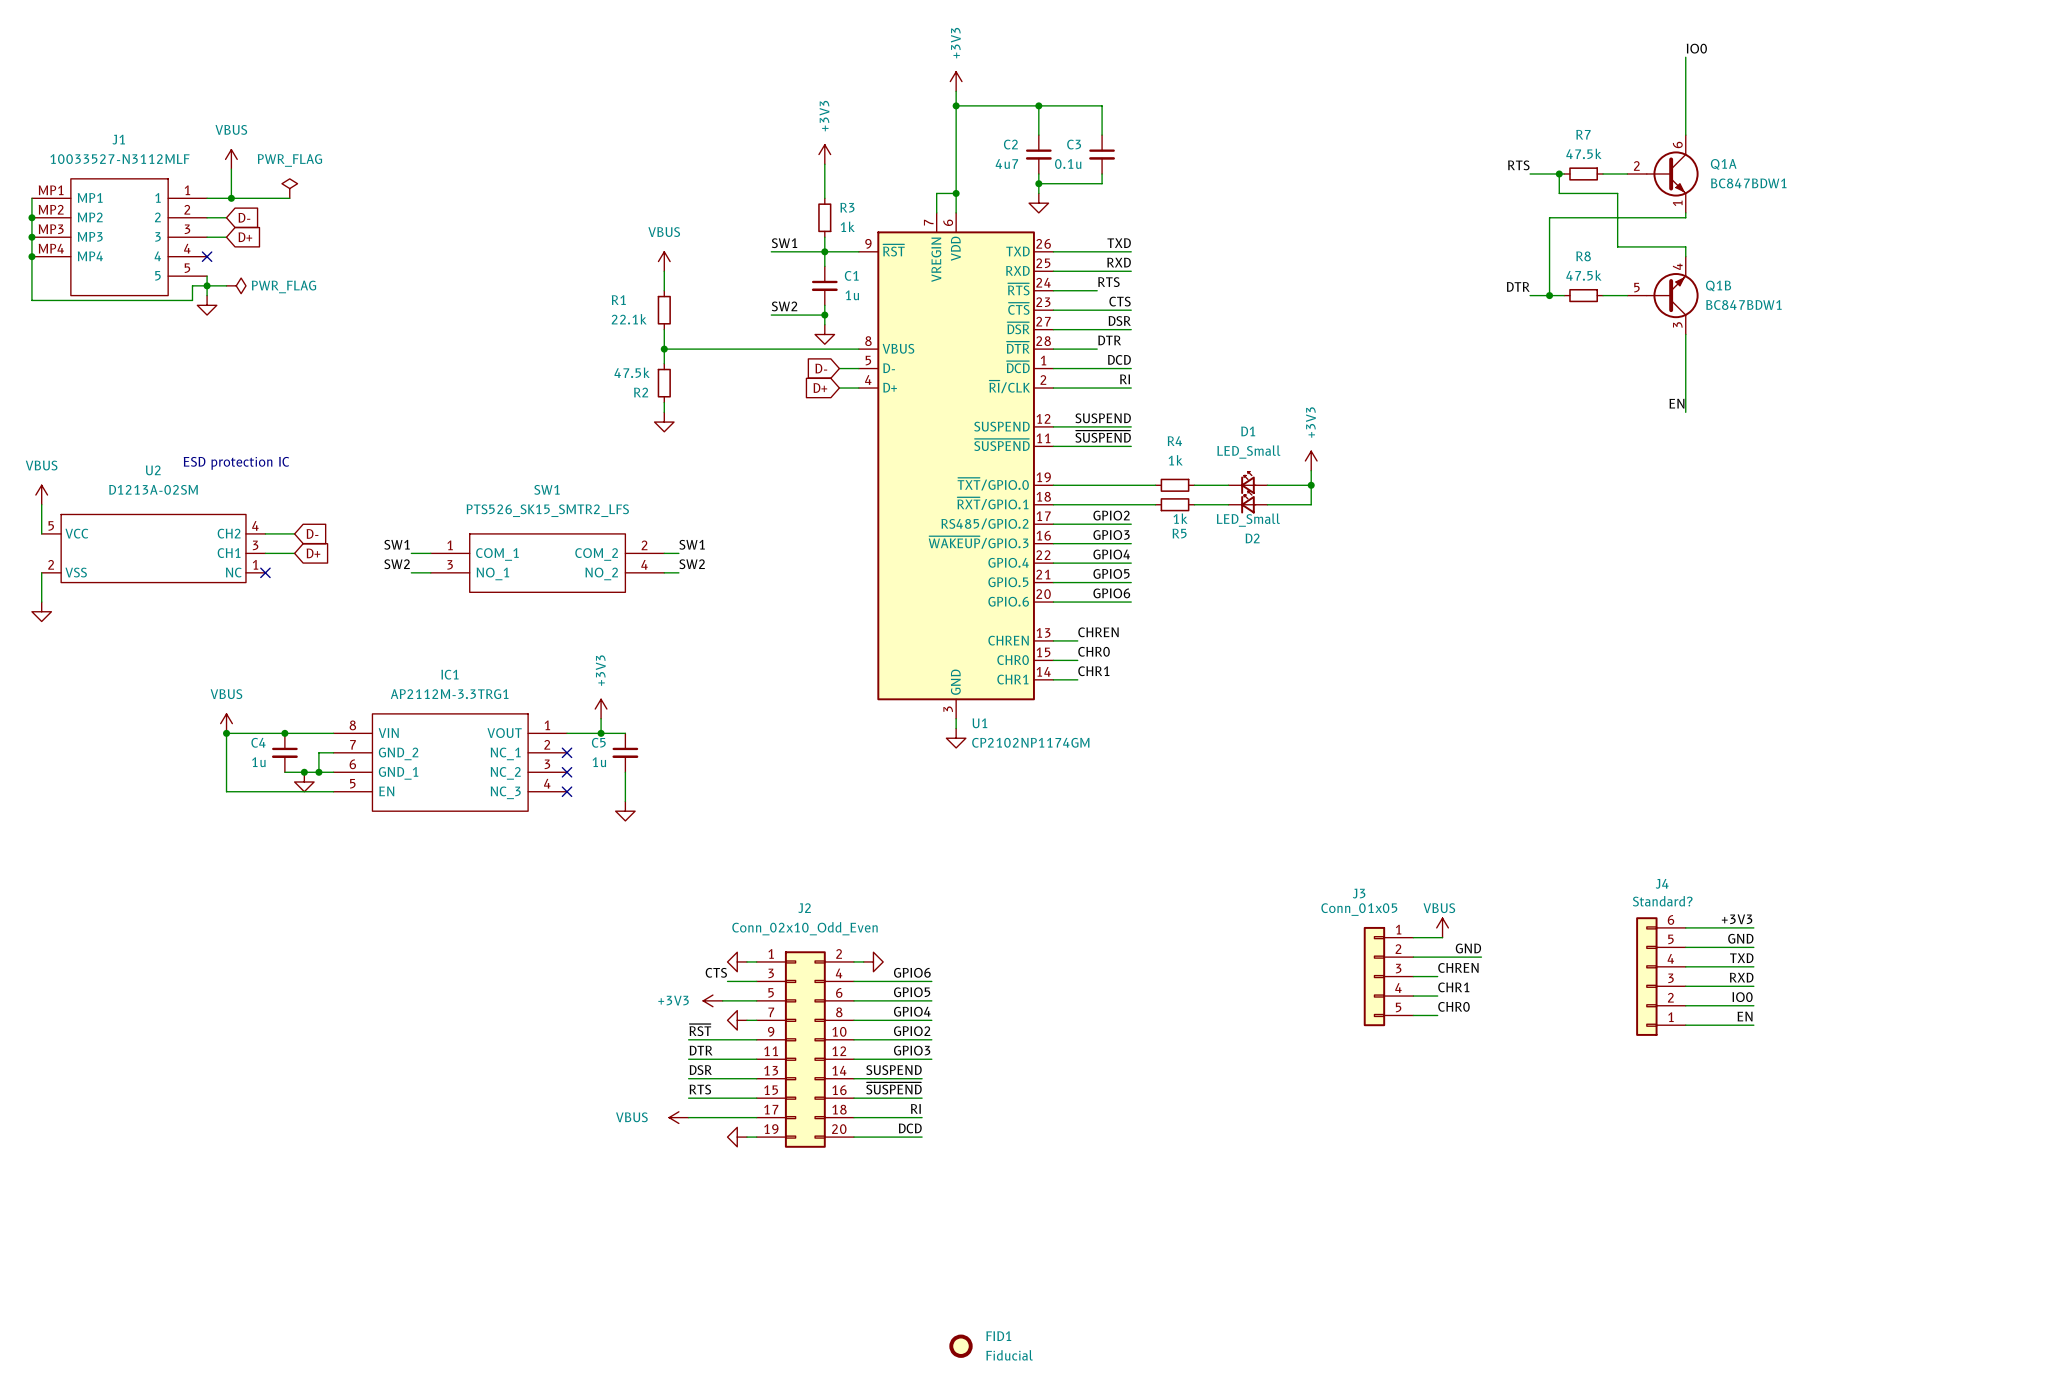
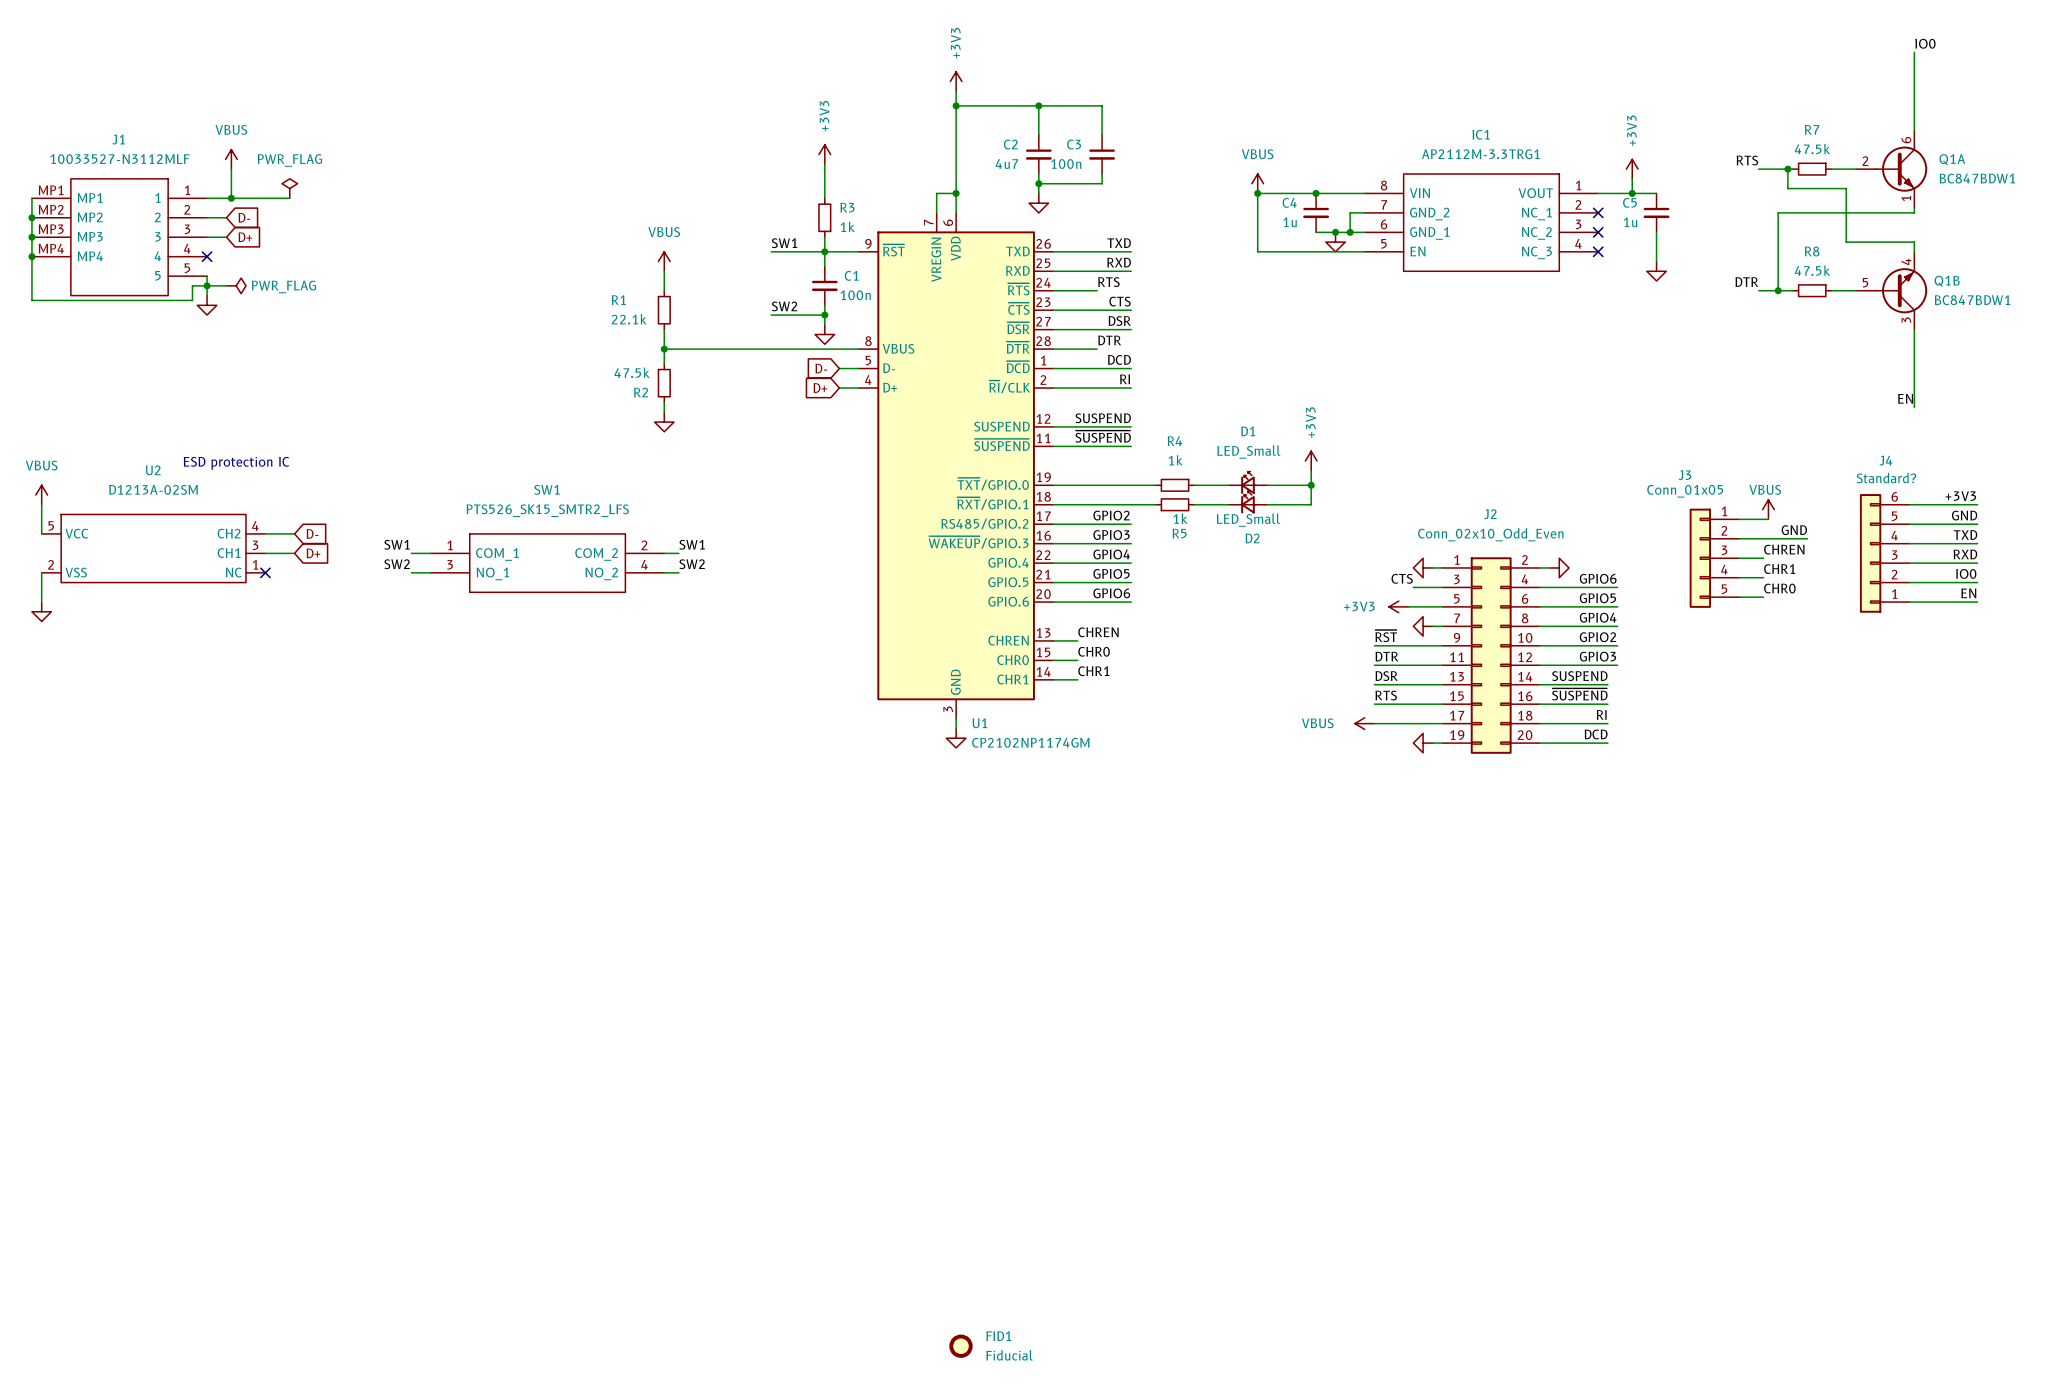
label: none -> IO0 (1925, 43)
label: IO0 (1696, 48) -> none
wire: none -> (1914, 52) (1914, 130)
wire: (1685, 57) (1685, 135) -> none
label: none -> RTS (1747, 160)
C3 value: 0.1u (1068, 164) -> 100n (1066, 164)
label: RTS (1518, 165) -> none
power symbol: none -> +3V3 (1632, 169)
wire: none -> (1758, 169) (1792, 169)
wire: none -> (1787, 169) (1787, 188) (1846, 188) (1846, 242) (1914, 242) (1914, 251)
junction: none -> (1787, 169)
wire: none -> (1831, 169) (1855, 169)
junction: (1559, 173) -> none
R7 position: (1583, 173) -> (1812, 169)
wire: (1603, 173) (1627, 173) -> none
Q1A position: (1662, 173) -> (1891, 169)
wire: none -> (1632, 178) (1632, 193)
power symbol: none -> VBUS (1257, 183)
junction: none -> (1257, 193)
junction: none -> (1316, 193)
wire: none -> (1364, 193) (1257, 193) (1257, 251) (1364, 251)
wire: (1617, 193) (1617, 246) (1685, 246) (1685, 256) -> (1617, 193) (1656, 193)
junction: none -> (1632, 193)
wire: none -> (1914, 208) (1914, 212) (1778, 212) (1778, 290)
wire: none -> (1364, 212) (1350, 212) (1350, 232)
no-connect mark: none -> (1598, 212)
wire: (1685, 212) (1685, 217) (1549, 217) (1549, 295) -> none
wire: none -> (1316, 232) (1364, 232)
junction: none -> (1335, 232)
junction: none -> (1350, 232)
no-connect mark: none -> (1598, 232)
wire: none -> (1656, 232) (1656, 261)
power symbol: none -> (1335, 242)
no-connect mark: none -> (1598, 251)
power symbol: none -> (1656, 271)
label: none -> DTR (1746, 282)
label: DTR (1518, 286) -> none
wire: none -> (1758, 290) (1792, 290)
junction: none -> (1778, 290)
wire: none -> (1831, 290) (1855, 290)
C1 value: 1u (852, 295) -> 100n (855, 295)
wire: (1530, 295) (1564, 295) -> none
junction: (1549, 295) -> none
R8 position: (1583, 295) -> (1812, 290)
wire: (1603, 295) (1627, 295) -> none
Q1B position: (1662, 295) -> (1891, 290)
wire: none -> (1914, 329) (1914, 407)
wire: (1685, 334) (1685, 412) -> none
label: none -> EN (1905, 398)
label: EN (1676, 403) -> none
label: none -> +3V3 (1960, 496)
wire: none -> (1909, 504) (1977, 504)
power symbol: none -> VBUS (1768, 509)
label: none -> GND (1964, 515)
wire: none -> (1739, 519) (1768, 519)
wire: none -> (1909, 524) (1977, 524)
label: none -> GND (1794, 530)
label: none -> TXD (1965, 534)
wire: none -> (1739, 538) (1807, 538)
wire: none -> (1909, 543) (1977, 543)
label: none -> CHREN (1784, 549)
label: none -> RXD (1965, 554)
wire: none -> (1739, 558) (1763, 558)
wire: none -> (1909, 563) (1977, 563)
power symbol: none -> (1423, 567)
wire: none -> (1432, 567) (1442, 567)
wire: none -> (1539, 567) (1549, 567)
power symbol: none -> (1559, 567)
label: none -> CHR1 (1779, 569)
label: none -> IO0 (1966, 573)
wire: none -> (1739, 577) (1763, 577)
label: none -> CTS (1402, 578)
label: none -> GPIO6 (1598, 578)
wire: none -> (1909, 582) (1977, 582)
wire: none -> (1413, 587) (1442, 587)
wire: none -> (1539, 587) (1617, 587)
label: none -> CHR0 (1779, 588)
label: none -> EN (1968, 593)
wire: none -> (1739, 597) (1763, 597)
label: none -> GPIO5 (1597, 598)
wire: none -> (1909, 602) (1977, 602)
power symbol: none -> +3V3 (1398, 606)
wire: none -> (1408, 606) (1442, 606)
wire: none -> (1539, 606) (1617, 606)
label: none -> GPIO4 (1598, 617)
power symbol: none -> (1423, 626)
wire: none -> (1432, 626) (1442, 626)
wire: none -> (1539, 626) (1617, 626)
label: none -> ~{RST} (1386, 636)
label: none -> GPIO2 (1597, 637)
wire: none -> (1374, 645) (1442, 645)
wire: none -> (1539, 645) (1617, 645)
label: none -> DTR (1386, 656)
label: none -> GPIO3 (1597, 656)
wire: none -> (1374, 665) (1442, 665)
wire: none -> (1539, 665) (1617, 665)
label: none -> DSR (1386, 676)
label: none -> SUSPEND (1579, 676)
wire: none -> (1374, 684) (1442, 684)
wire: none -> (1539, 684) (1607, 684)
label: none -> ~{SUSPEND} (1579, 694)
label: none -> RTS (1386, 695)
wire: none -> (1374, 704) (1442, 704)
wire: none -> (1539, 704) (1607, 704)
power symbol: +3V3 (601, 709) -> none
label: none -> RI (1601, 714)
wire: (601, 718) (601, 733) -> none
power symbol: VBUS (226, 723) -> none
power symbol: none -> VBUS (1364, 723)
wire: none -> (1374, 723) (1442, 723)
wire: none -> (1539, 723) (1607, 723)
junction: (226, 733) -> none
junction: (284, 733) -> none
wire: (333, 733) (226, 733) (226, 791) (333, 791) -> none
wire: (567, 733) (625, 733) -> none
junction: (601, 733) -> none
label: none -> DCD (1596, 734)
power symbol: none -> (1423, 743)
wire: none -> (1432, 743) (1442, 743)
wire: none -> (1539, 743) (1607, 743)
C4 position: (284, 752) -> (1316, 212)
wire: (333, 752) (318, 752) (318, 772) -> none
no-connect mark: (567, 752) -> none
C5 position: (625, 752) -> (1656, 212)
IC1 position: (450, 762) -> (1481, 222)
wire: (284, 772) (333, 772) -> none
junction: (304, 772) -> none
junction: (318, 772) -> none
no-connect mark: (567, 772) -> none
wire: (625, 772) (625, 801) -> none
power symbol: (304, 782) -> none
no-connect mark: (567, 791) -> none
power symbol: (625, 811) -> none
label: +3V3 (1737, 919) -> none
power symbol: VBUS (1442, 927) -> none
wire: (1685, 927) (1753, 927) -> none
wire: (1413, 937) (1442, 937) -> none
label: GND (1740, 938) -> none
wire: (1685, 947) (1753, 947) -> none
label: GND (1468, 948) -> none
wire: (1413, 957) (1481, 957) -> none
label: TXD (1741, 958) -> none
power symbol: (737, 961) -> none
wire: (746, 961) (756, 961) -> none
wire: (853, 961) (863, 961) -> none
power symbol: (873, 961) -> none
wire: (1685, 966) (1753, 966) -> none
label: CHREN (1458, 967) -> none
label: CTS (716, 972) -> none
label: GPIO6 (912, 972) -> none
J3 position: (1388, 976) -> (1714, 558)
wire: (1413, 976) (1437, 976) -> none
J4 position: (1660, 976) -> (1884, 553)
label: RXD (1741, 977) -> none
wire: (727, 981) (756, 981) -> none
wire: (853, 981) (931, 981) -> none
wire: (1685, 986) (1753, 986) -> none
label: CHR1 (1453, 987) -> none
label: GPIO5 (912, 992) -> none
wire: (1413, 996) (1437, 996) -> none
label: IO0 (1742, 997) -> none
power symbol: +3V3 (712, 1000) -> none
wire: (722, 1000) (756, 1000) -> none
wire: (853, 1000) (931, 1000) -> none
wire: (1685, 1005) (1753, 1005) -> none
label: CHR0 (1453, 1006) -> none
label: GPIO4 (912, 1011) -> none
wire: (1413, 1015) (1437, 1015) -> none
label: EN (1745, 1016) -> none
power symbol: (737, 1020) -> none
wire: (746, 1020) (756, 1020) -> none
wire: (853, 1020) (931, 1020) -> none
wire: (1685, 1025) (1753, 1025) -> none
label: ~{RST} (700, 1030) -> none
label: GPIO2 (912, 1031) -> none
wire: (688, 1039) (756, 1039) -> none
wire: (853, 1039) (931, 1039) -> none
J2 position: (805, 1049) -> (1491, 655)
label: DTR (701, 1050) -> none
label: GPIO3 (912, 1050) -> none
wire: (688, 1059) (756, 1059) -> none
wire: (853, 1059) (931, 1059) -> none
label: DSR (700, 1070) -> none
label: SUSPEND (894, 1070) -> none
wire: (688, 1078) (756, 1078) -> none
wire: (853, 1078) (922, 1078) -> none
label: ~{SUSPEND} (894, 1088) -> none
label: RTS (700, 1089) -> none
wire: (688, 1098) (756, 1098) -> none
wire: (853, 1098) (922, 1098) -> none
label: RI (915, 1108) -> none
power symbol: VBUS (678, 1117) -> none
wire: (688, 1117) (756, 1117) -> none
wire: (853, 1117) (922, 1117) -> none
label: DCD (910, 1128) -> none
power symbol: (737, 1137) -> none
wire: (746, 1137) (756, 1137) -> none
wire: (853, 1137) (922, 1137) -> none

